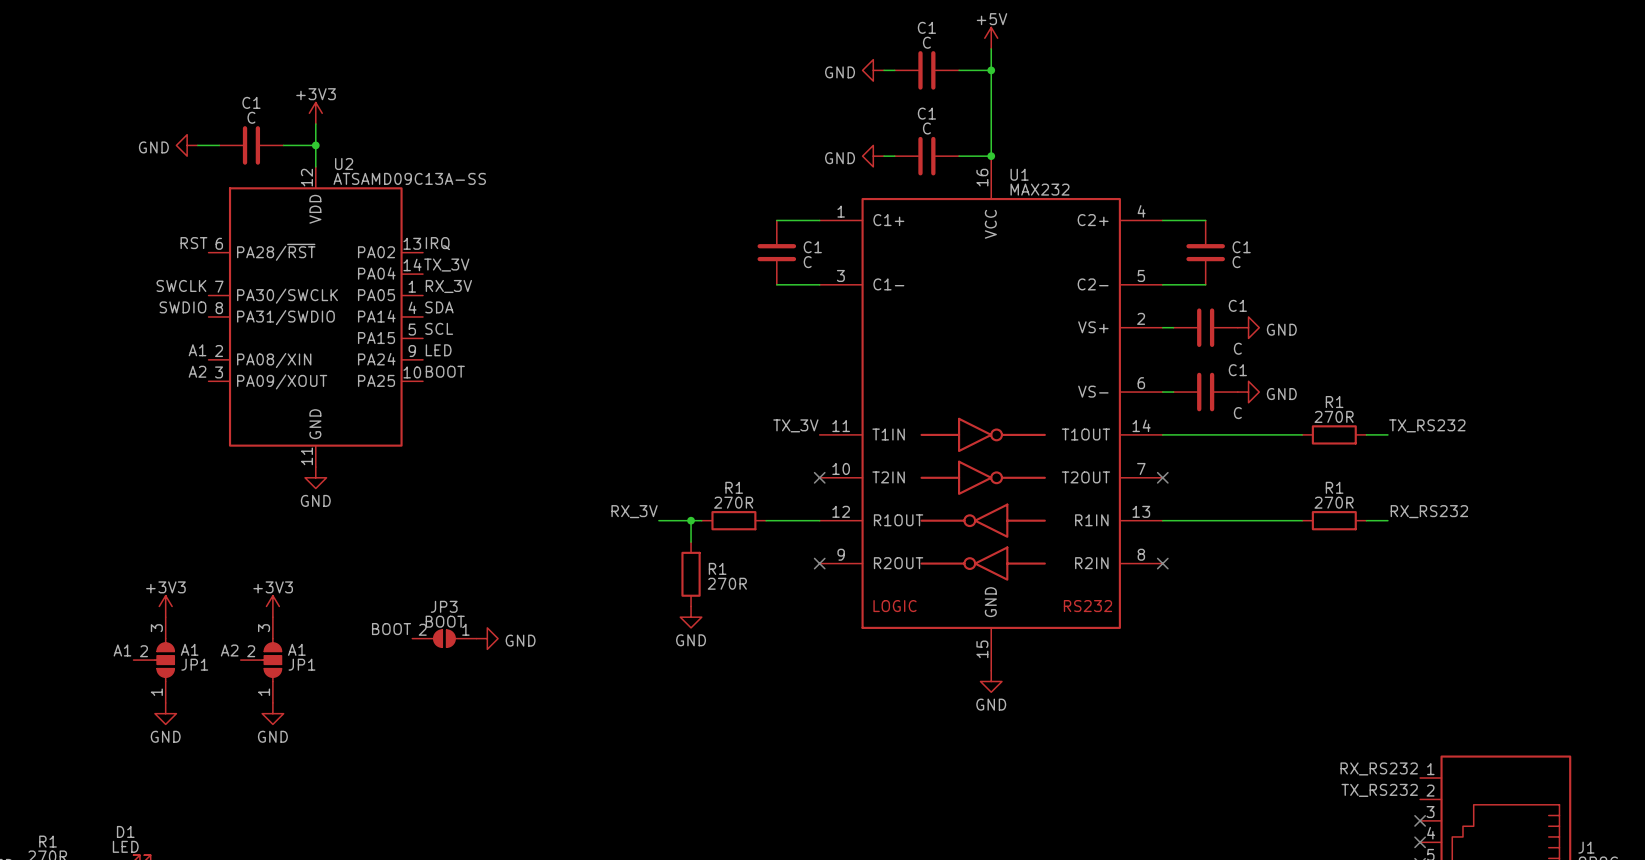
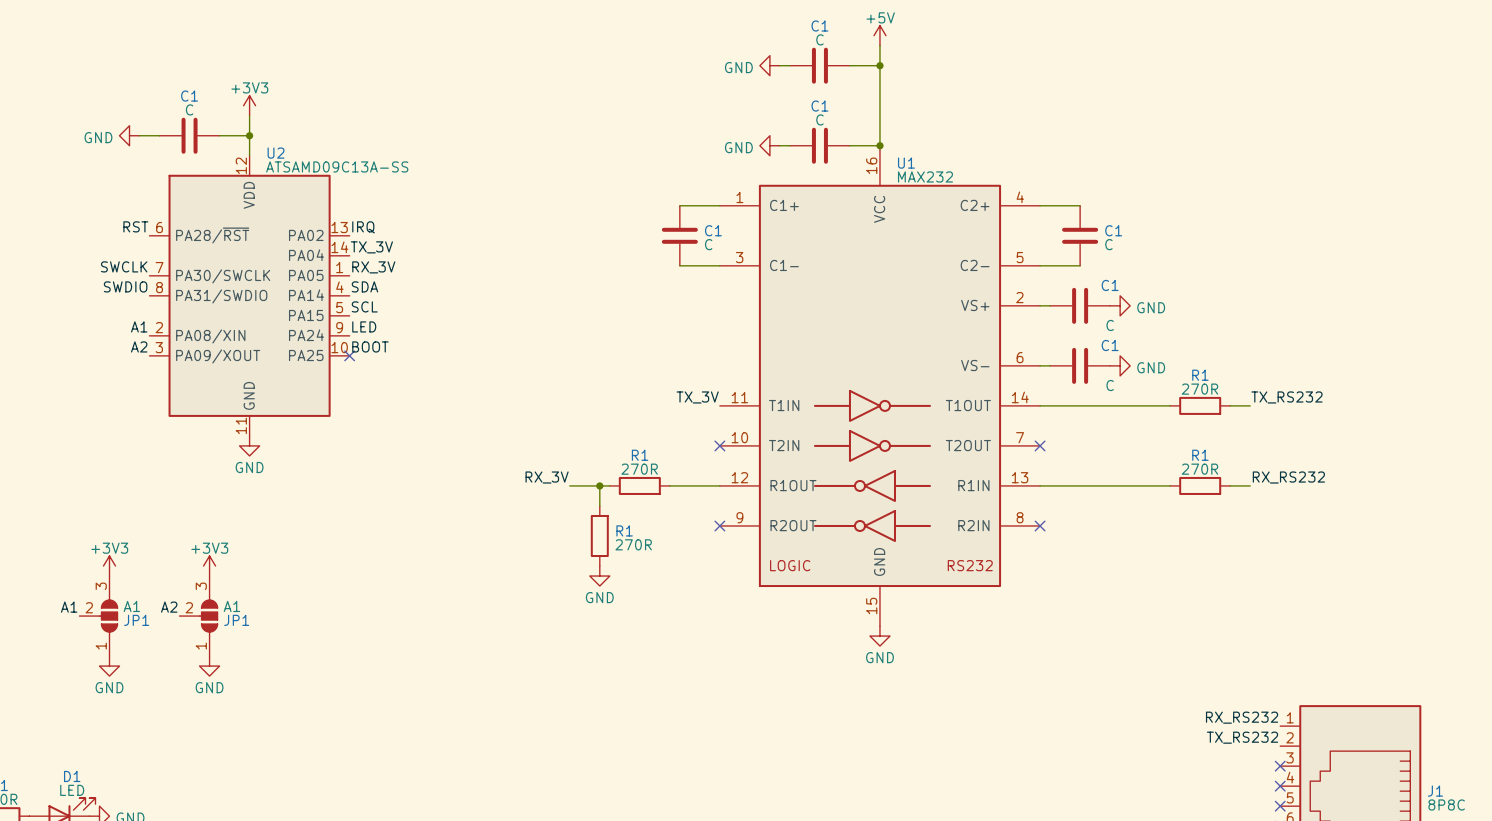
no-connect mark: none -> (349, 355)
label: BOOT (391, 629) -> none
JP3: BOOT (444, 638) -> none
power symbol: GND (487, 638) -> none

